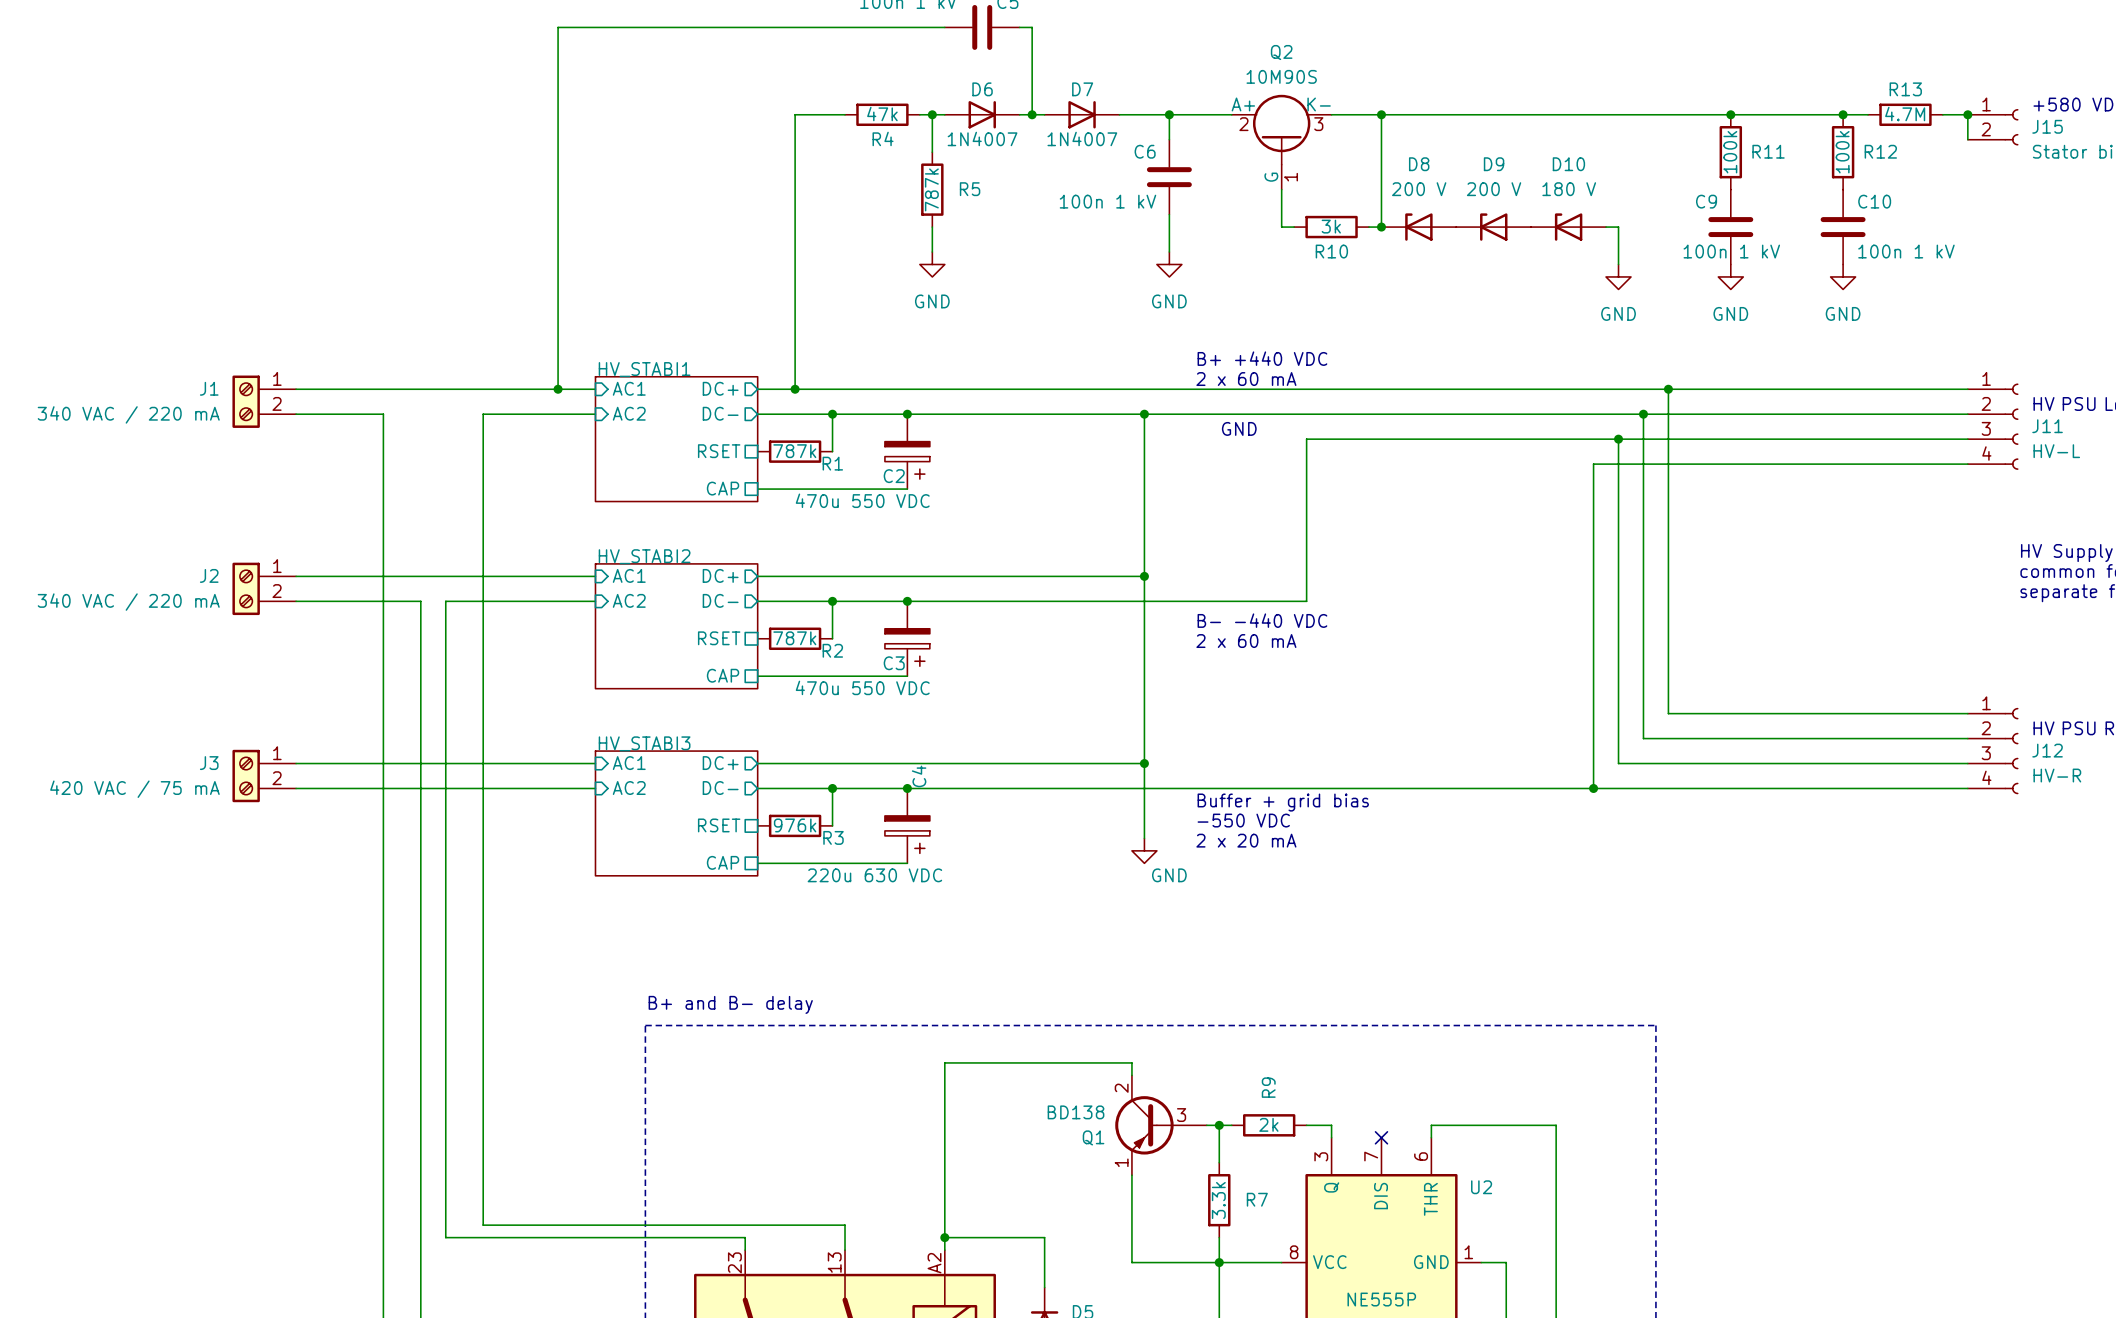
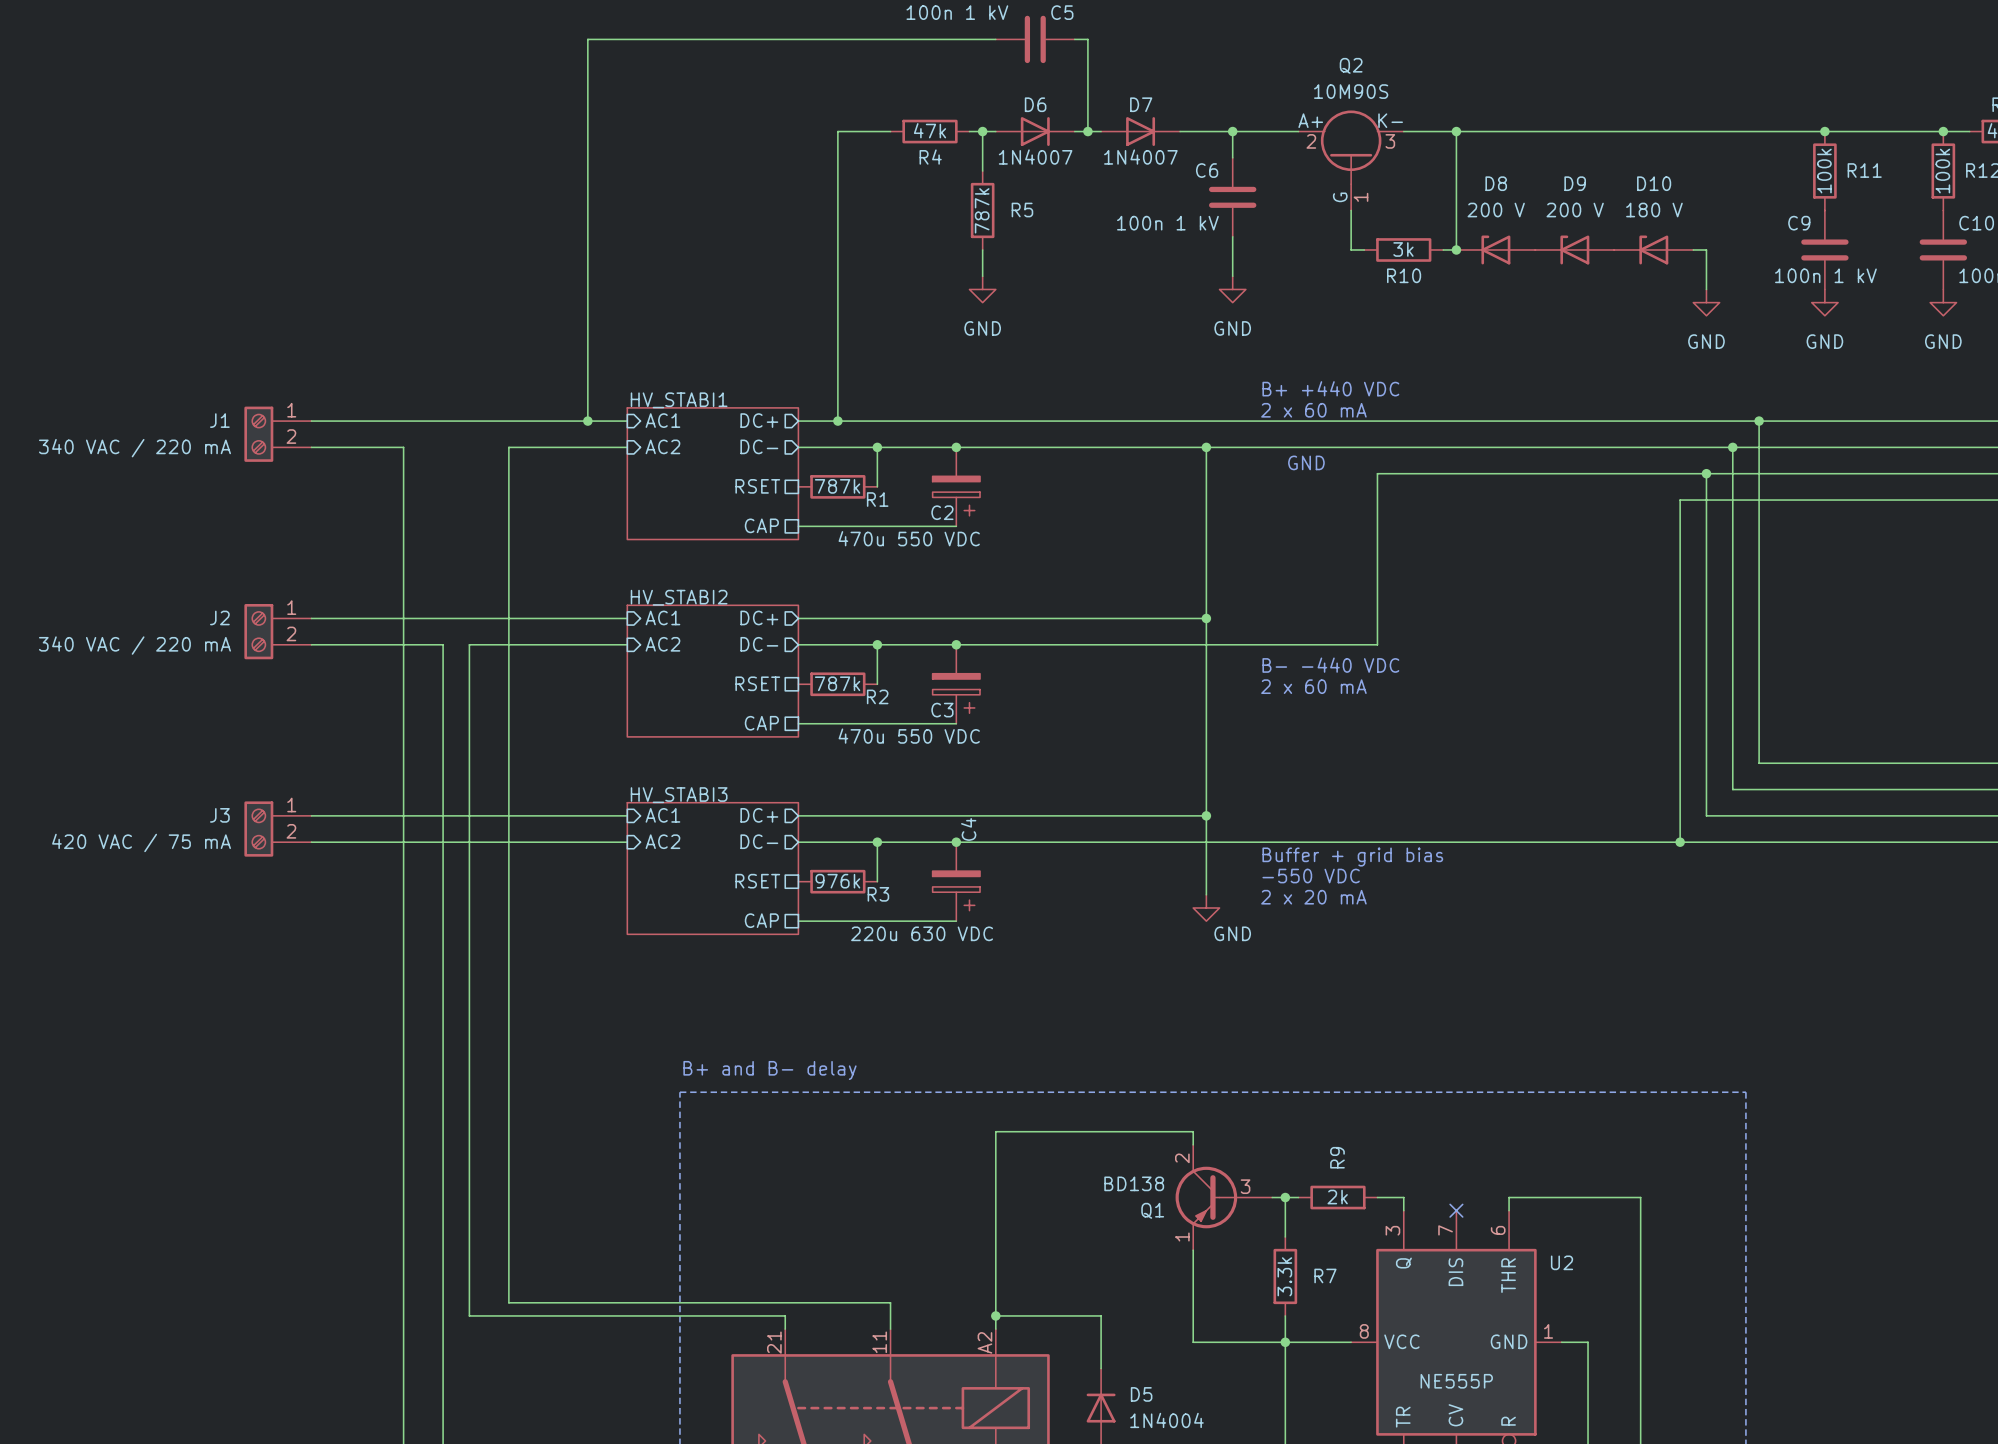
part pin number: 23 (734, 1262) -> 21 (774, 1342)
part pin number: 13 (834, 1262) -> 11 (879, 1342)

